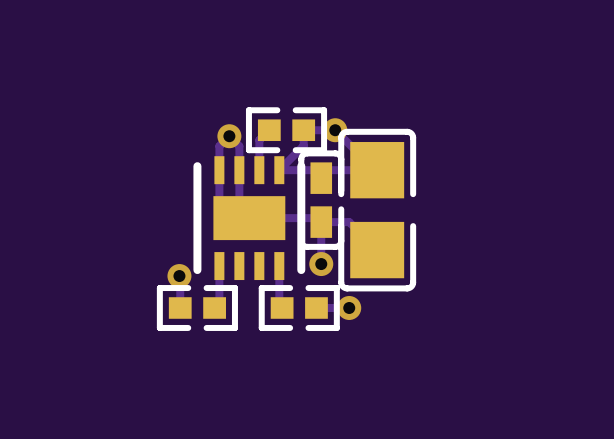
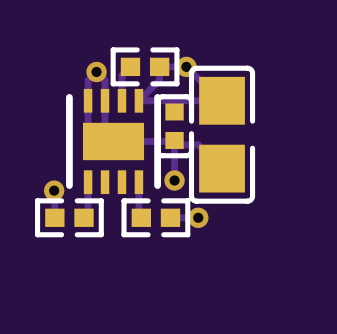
part footprint: [298, 150, 345, 250] -> [155, 94, 195, 159]

